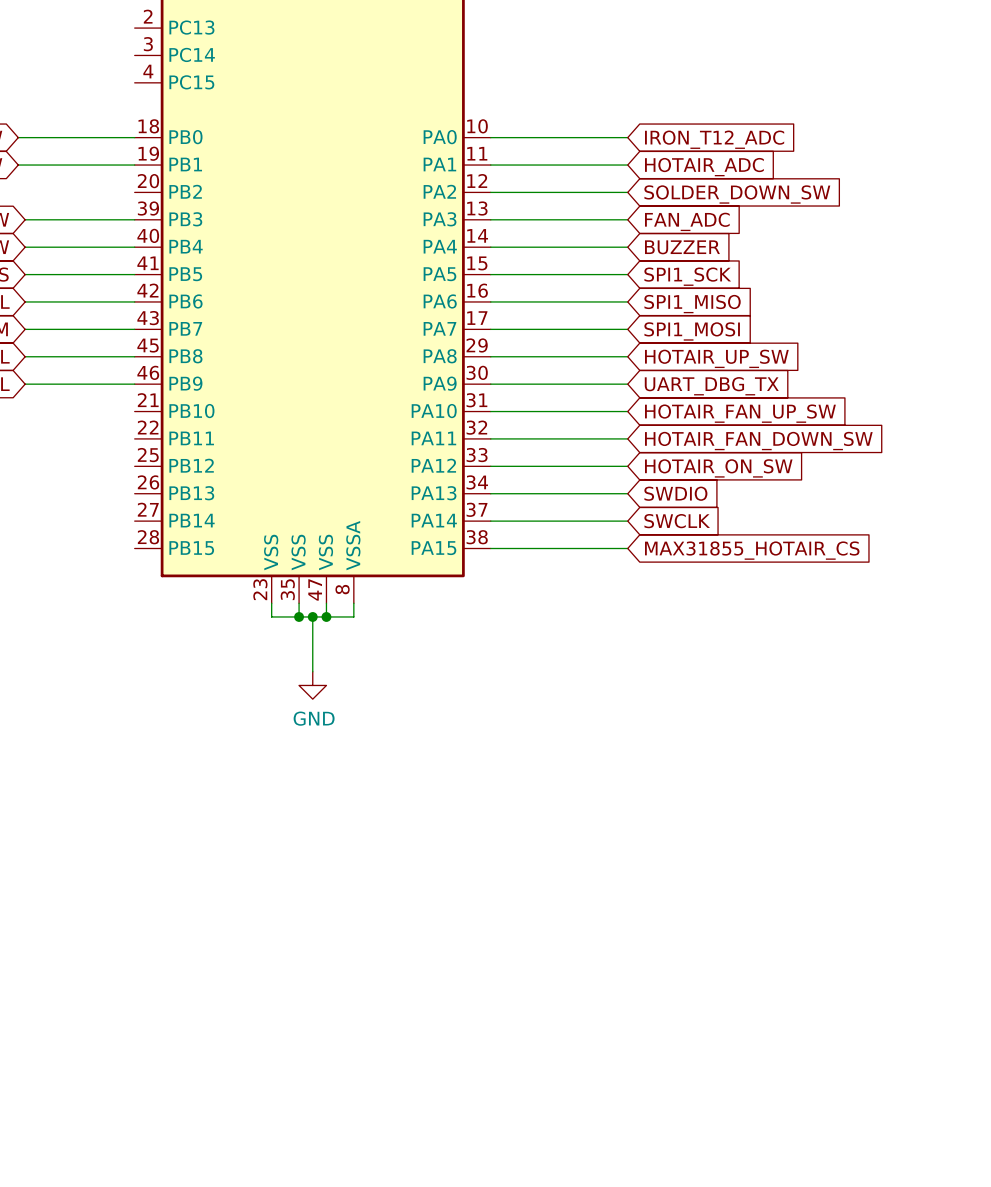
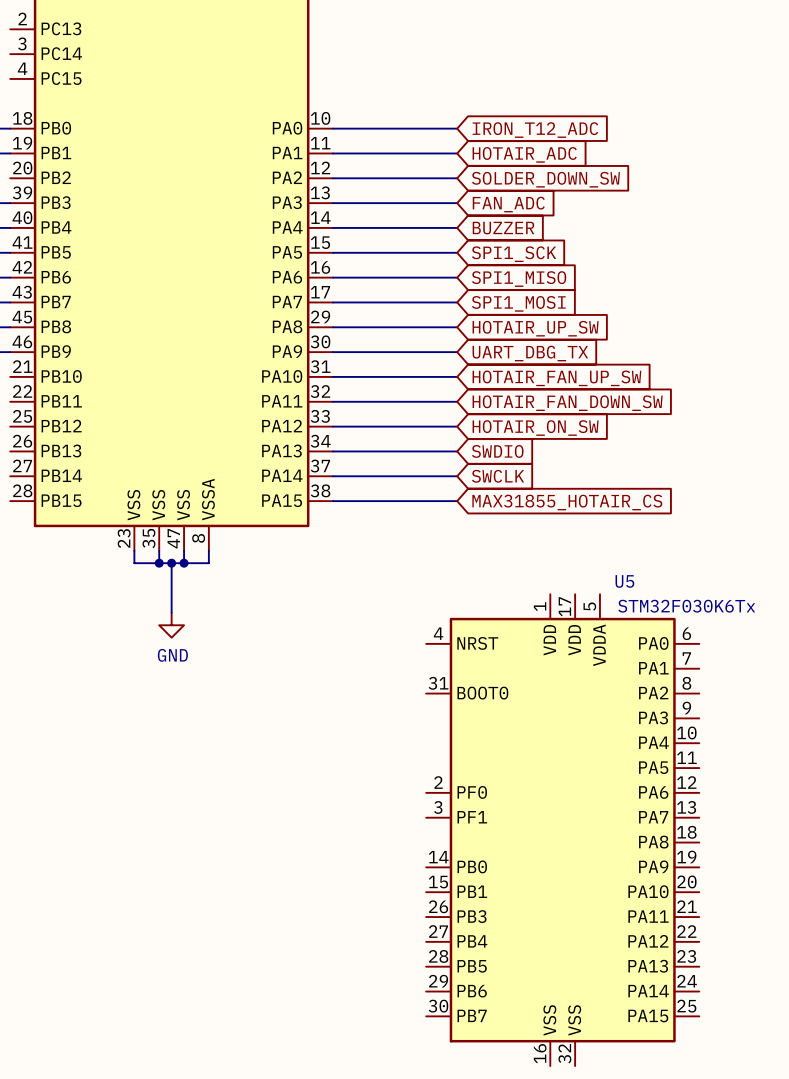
U5: none -> STM32F030K6Tx (562, 830)

